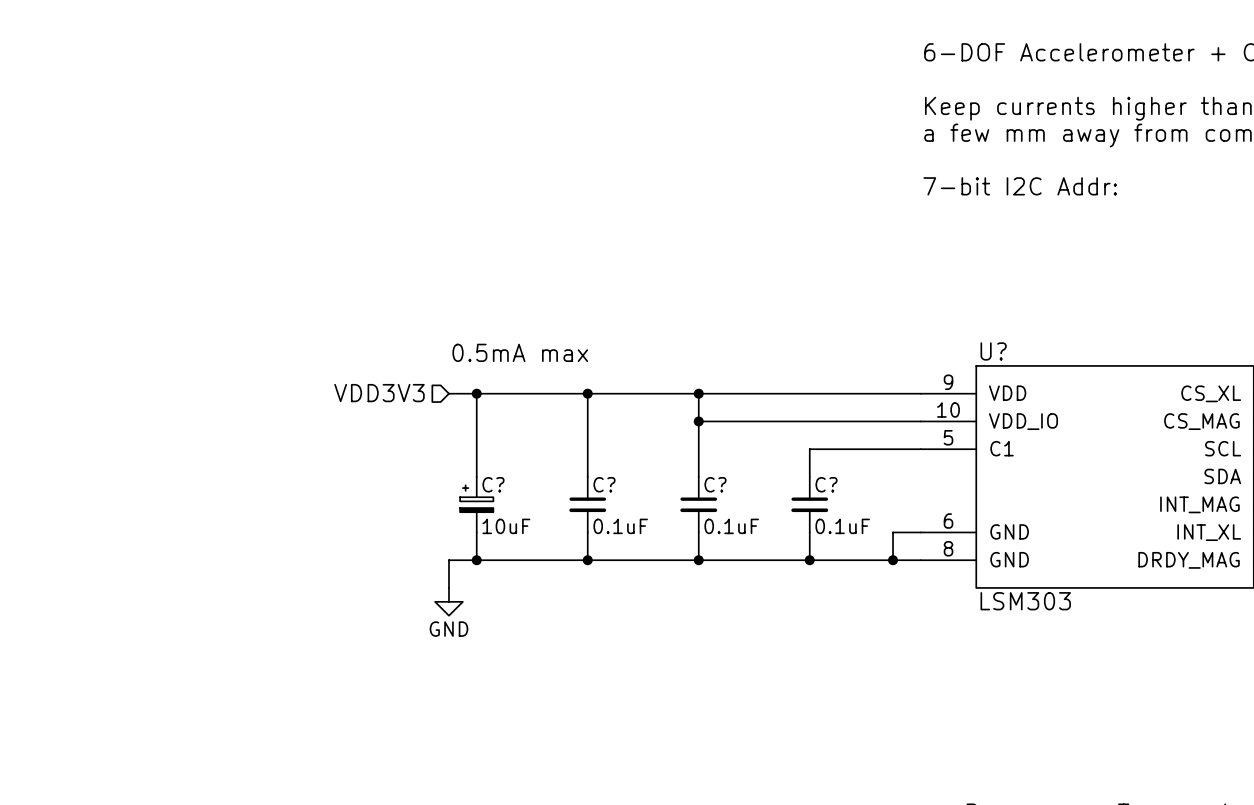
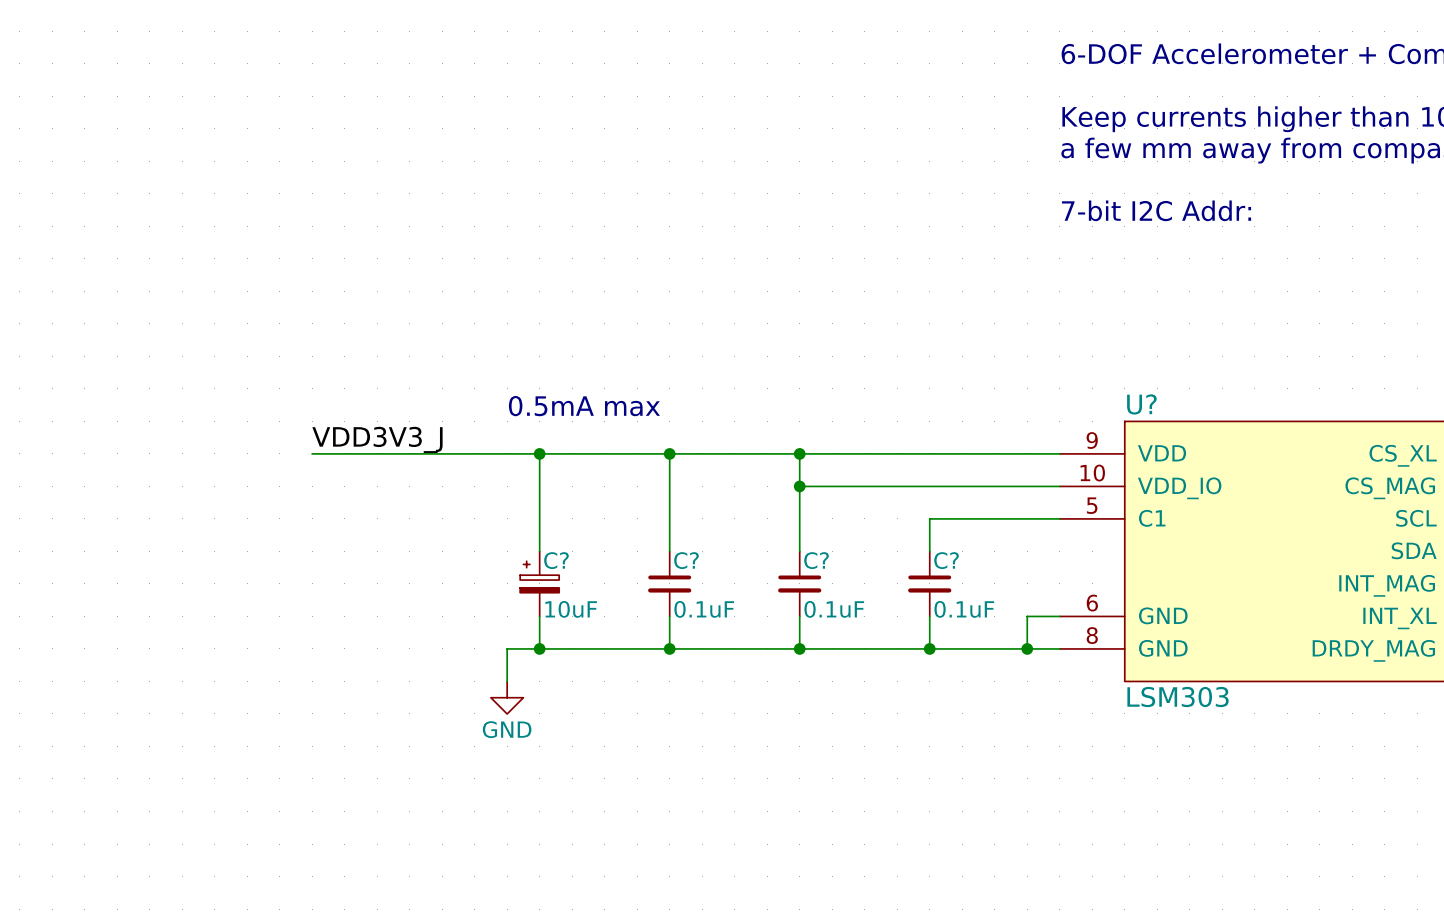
label: none -> VDD3V3_J (377, 439)
wire: none -> (312, 453) (507, 453)
hierarchical label: VDD3V3 (379, 393) -> none

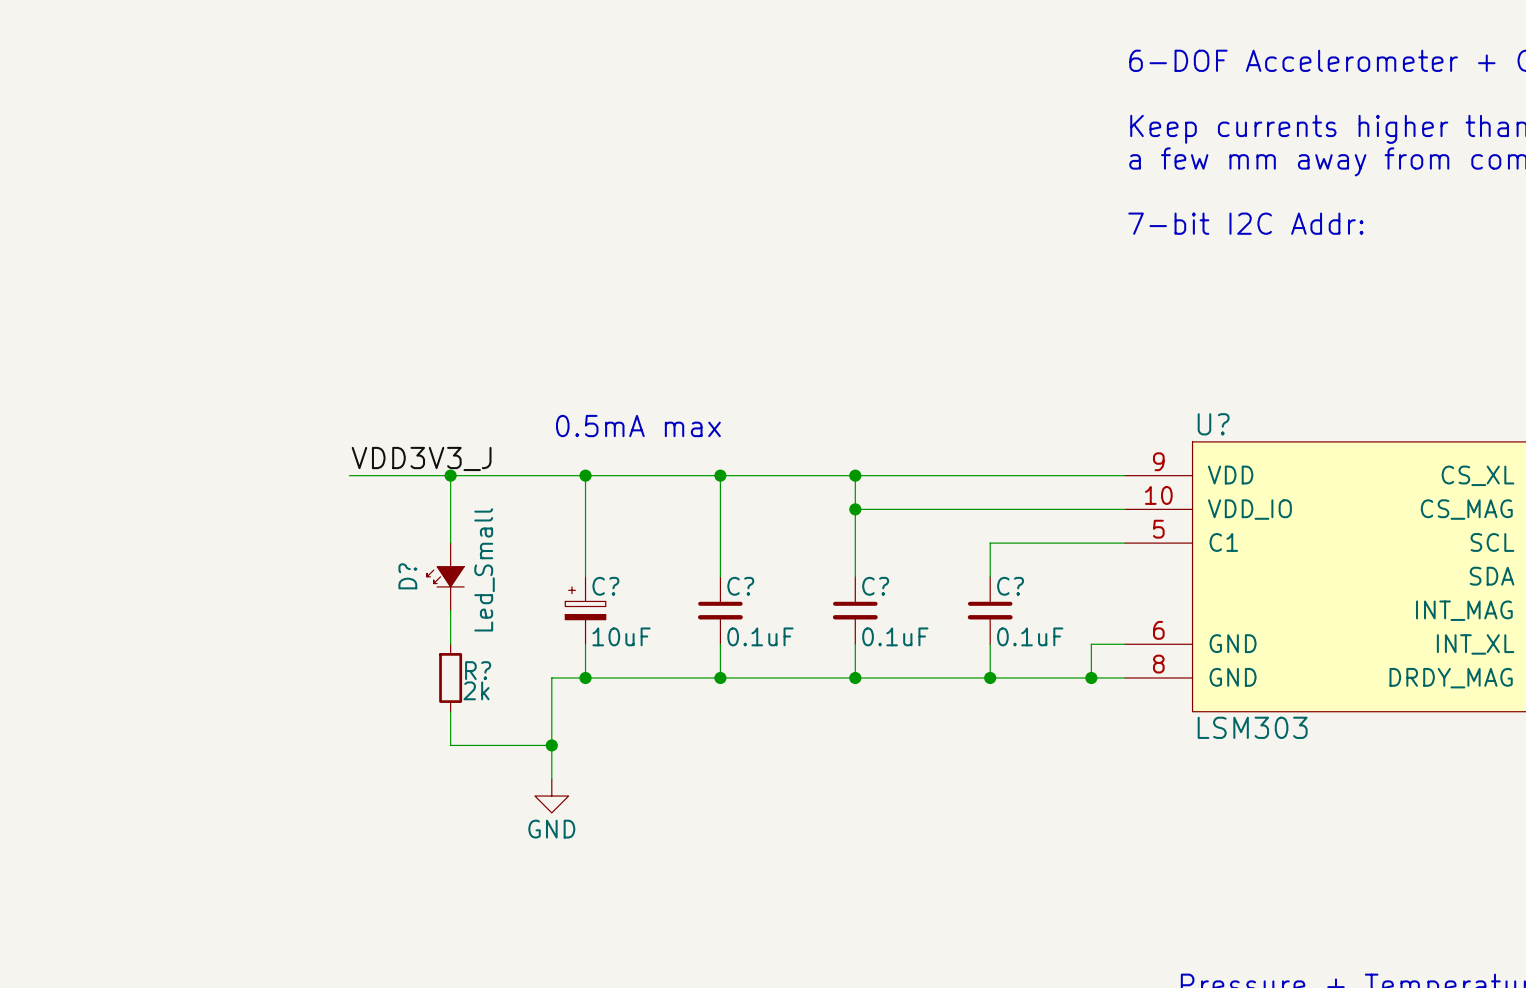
wire: none -> (450, 475) (450, 543)
junction: none -> (450, 475)
D?: none -> Led_Small (445, 576)
wire: none -> (450, 610) (450, 644)
R?: none -> 2k (450, 677)
wire: none -> (450, 711) (450, 745) (551, 745)
wire: none -> (551, 711) (551, 779)
power symbol position: GND (507, 697) -> GND (551, 796)
junction: none -> (551, 745)

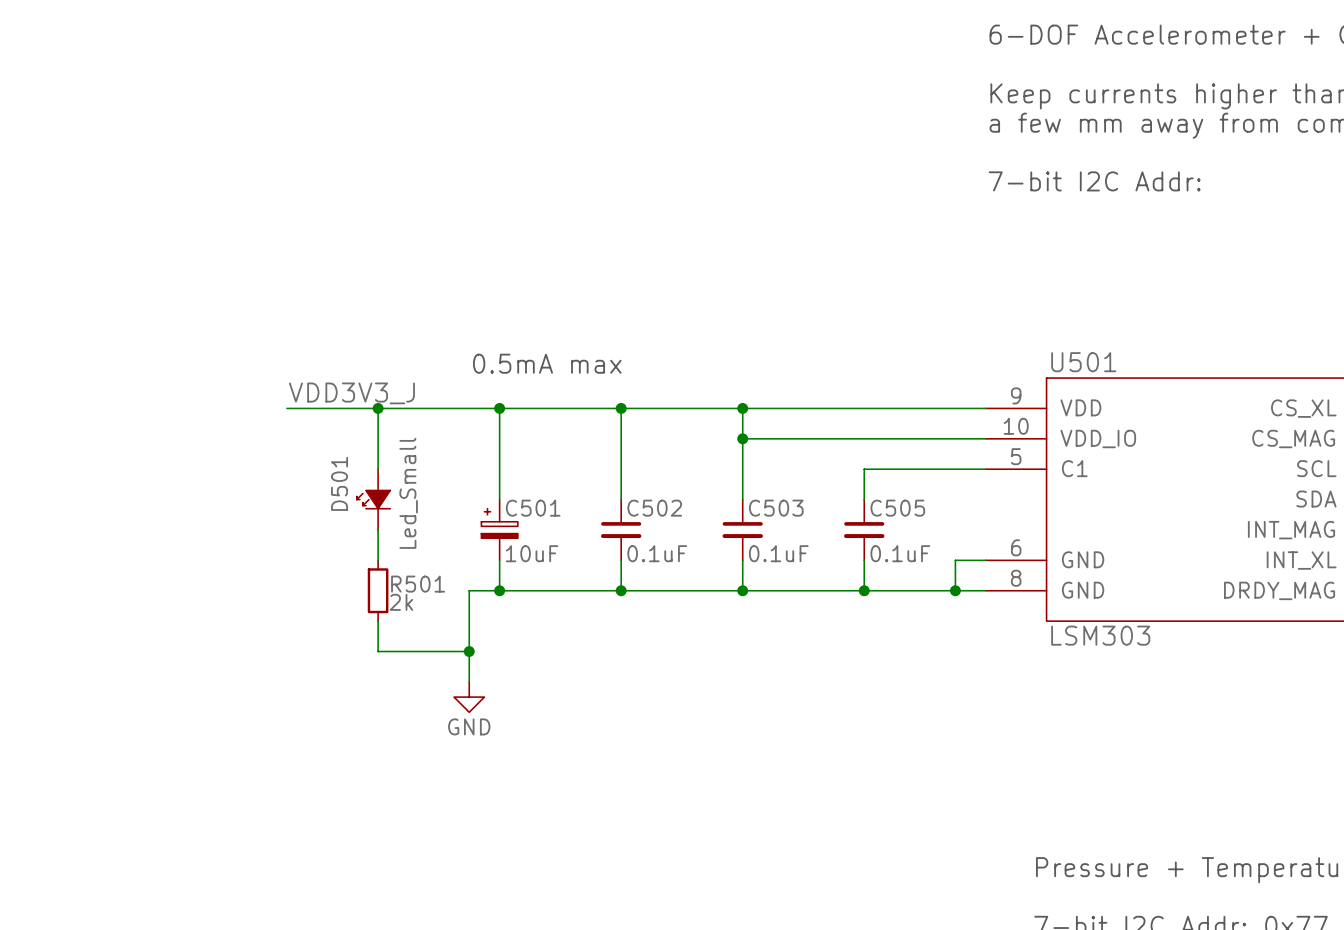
U? name: U? (1213, 424) -> U501 (1083, 362)
D? name: D? (407, 576) -> D501 (339, 483)
C? name: C? (605, 586) -> C501 (533, 508)
C? name: C? (740, 586) -> C502 (654, 508)
C? name: C? (875, 586) -> C503 (776, 508)
C? name: C? (1010, 586) -> C505 (897, 508)
R? name: R? (478, 670) -> R501 (418, 584)

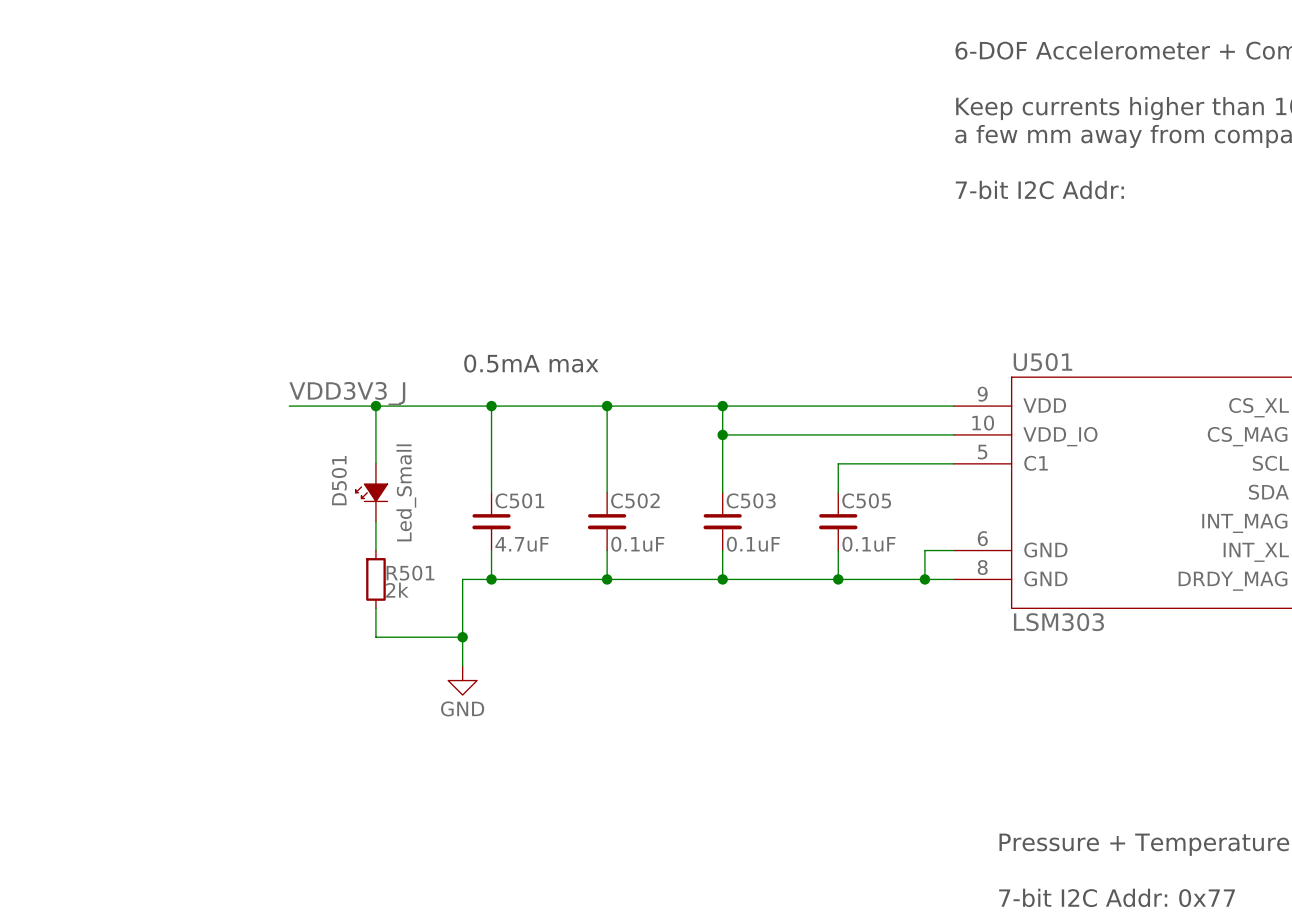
C501 symbol: [481, 499, 518, 561] -> [472, 492, 511, 551]
C501 value: 10uF (532, 553) -> 4.7uF (522, 544)

